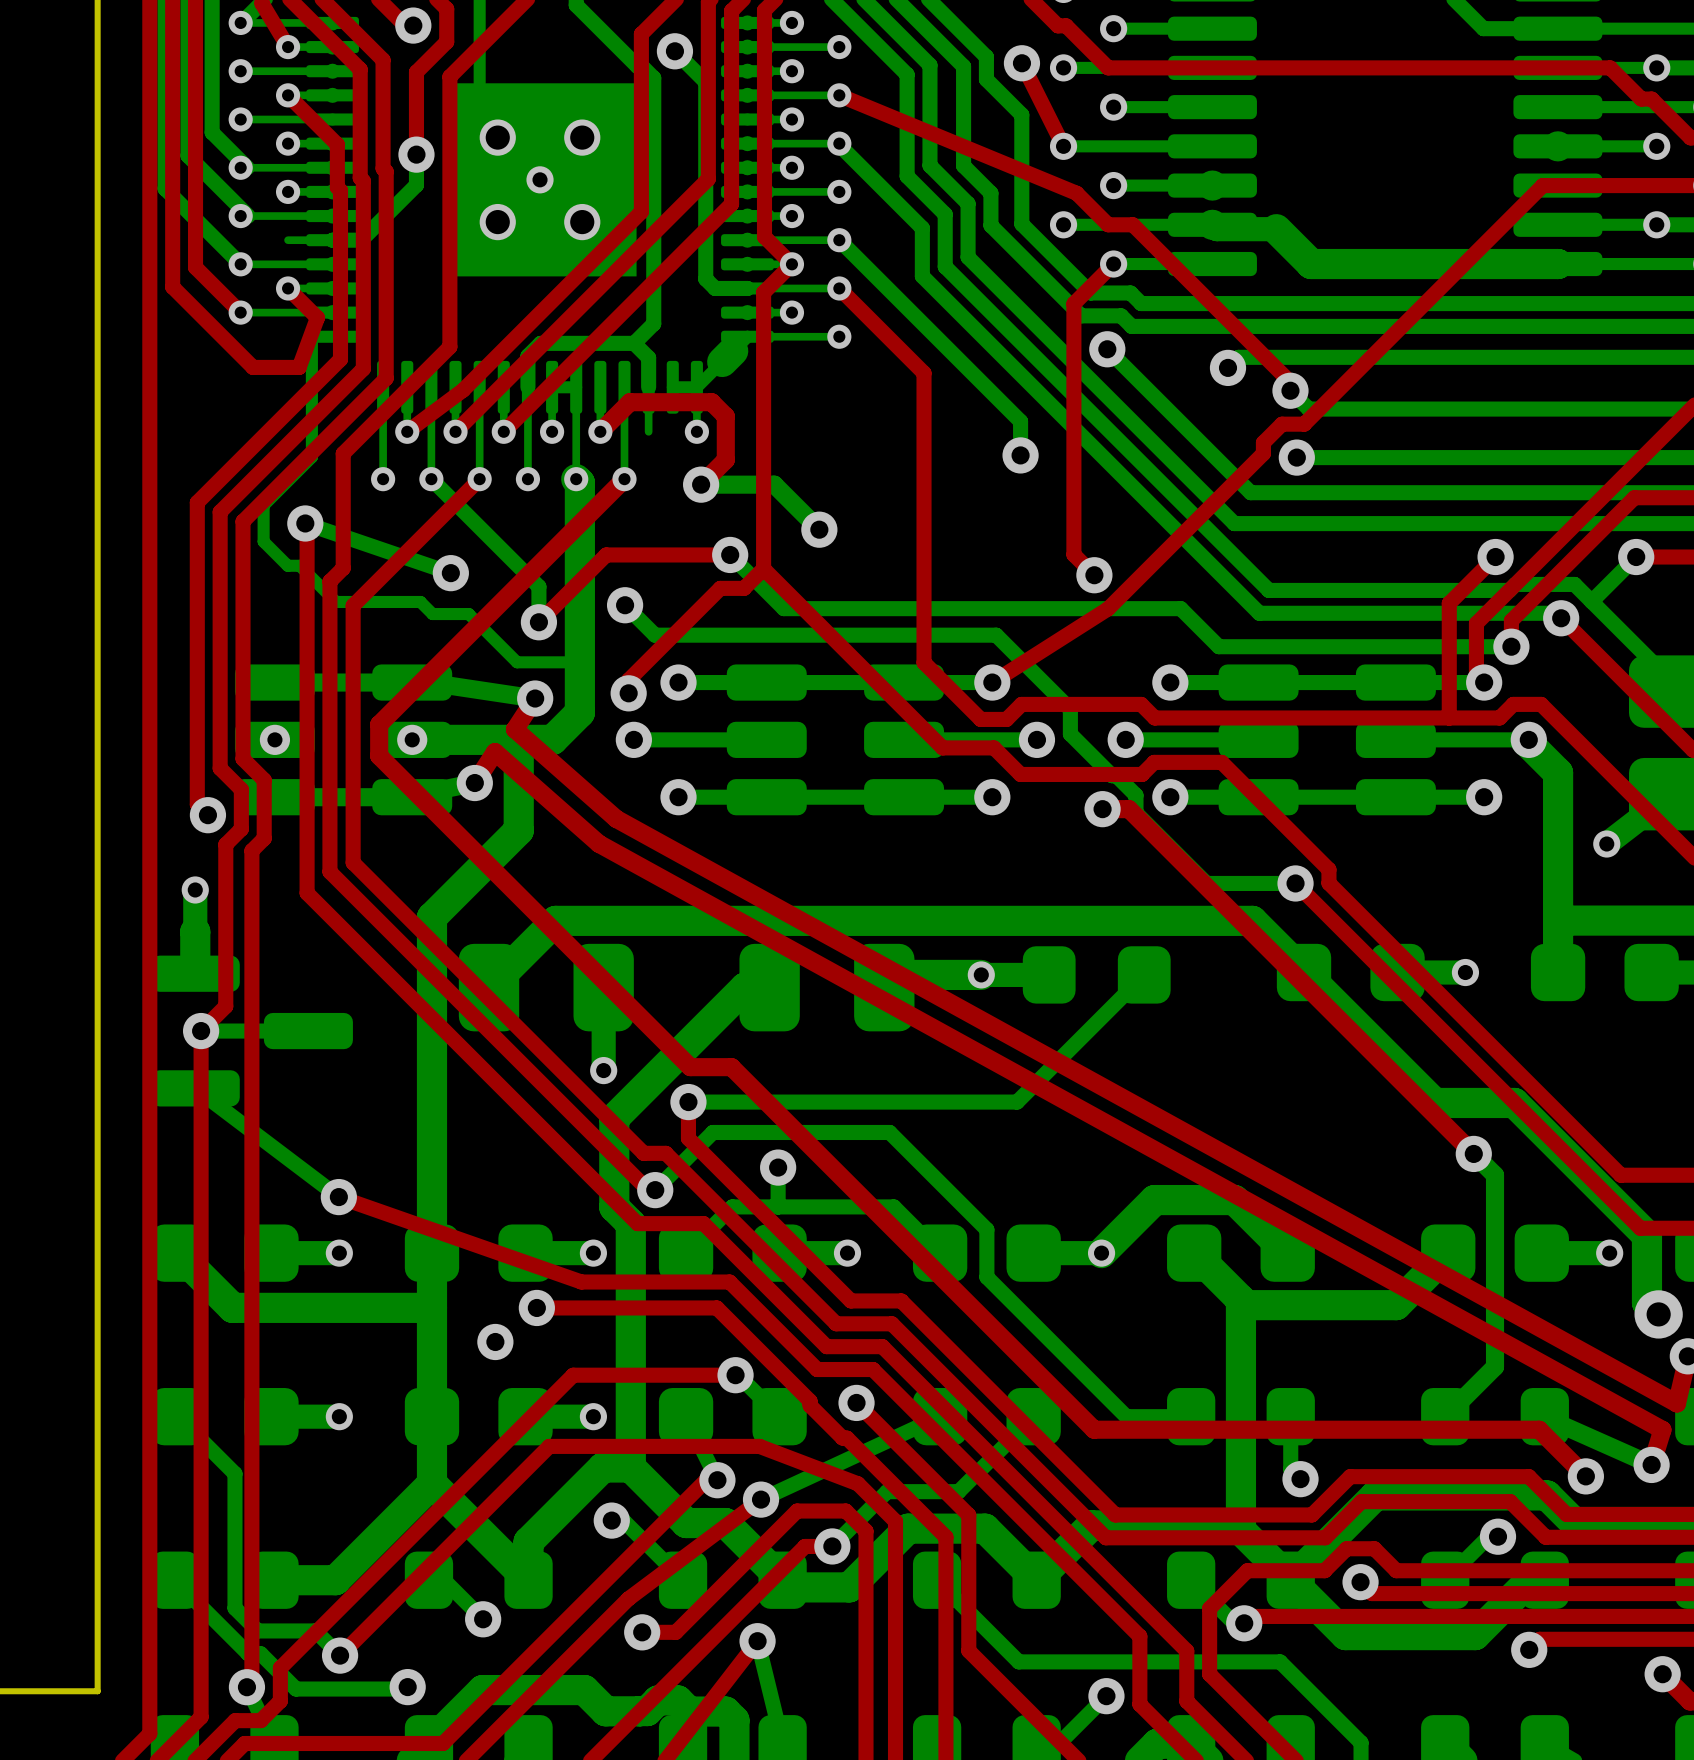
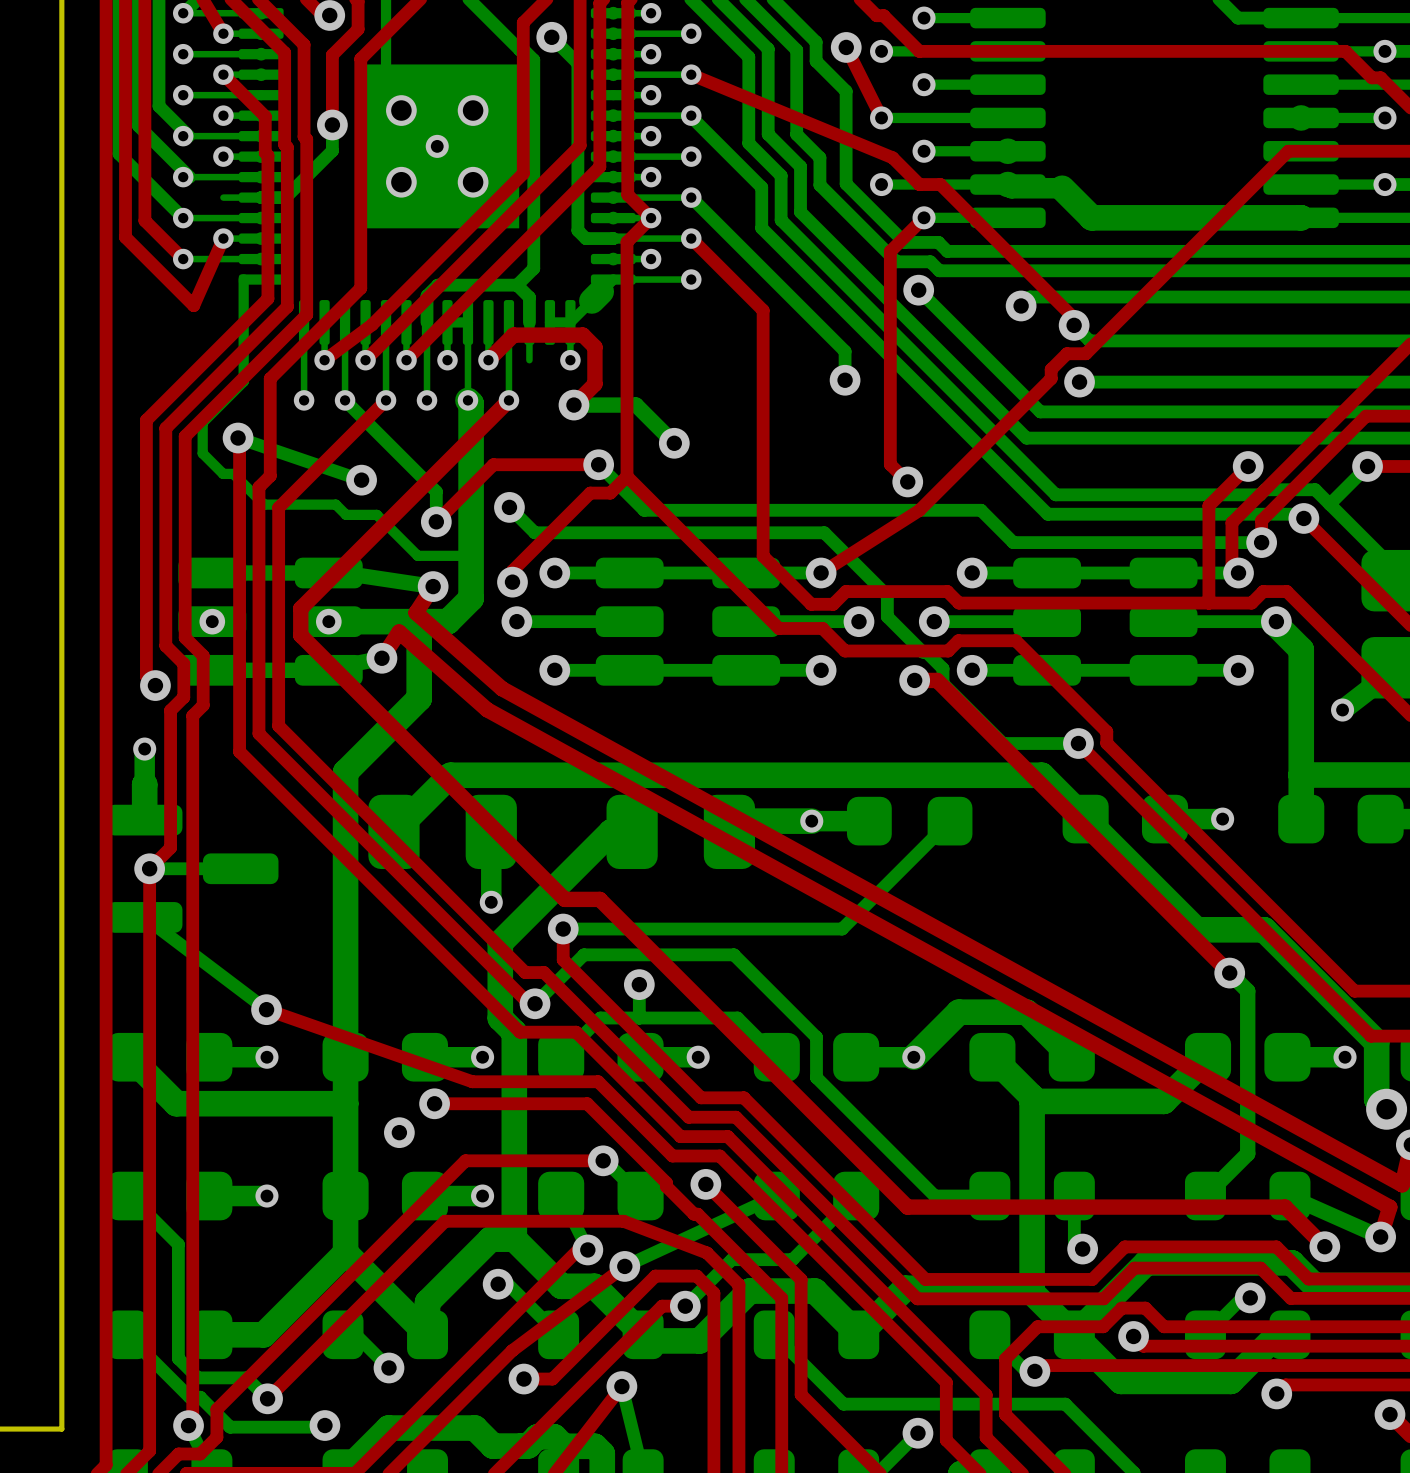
top track: (288, 288) (317, 317) (299, 367) (253, 367) -> (223, 238) (193, 305)

